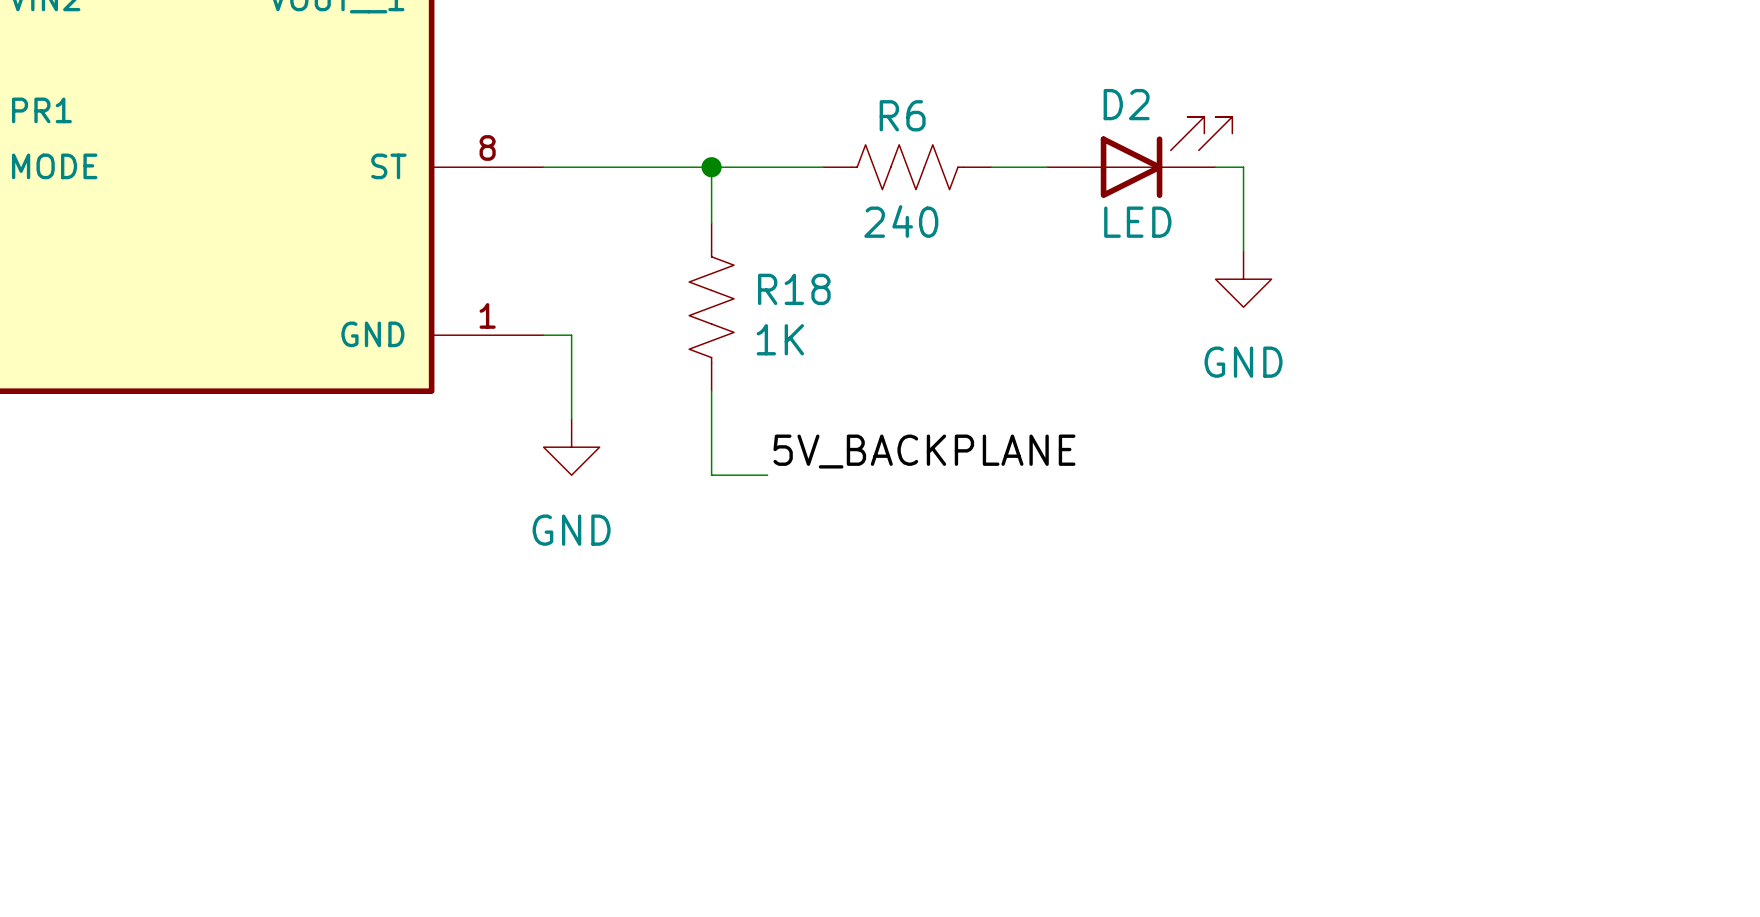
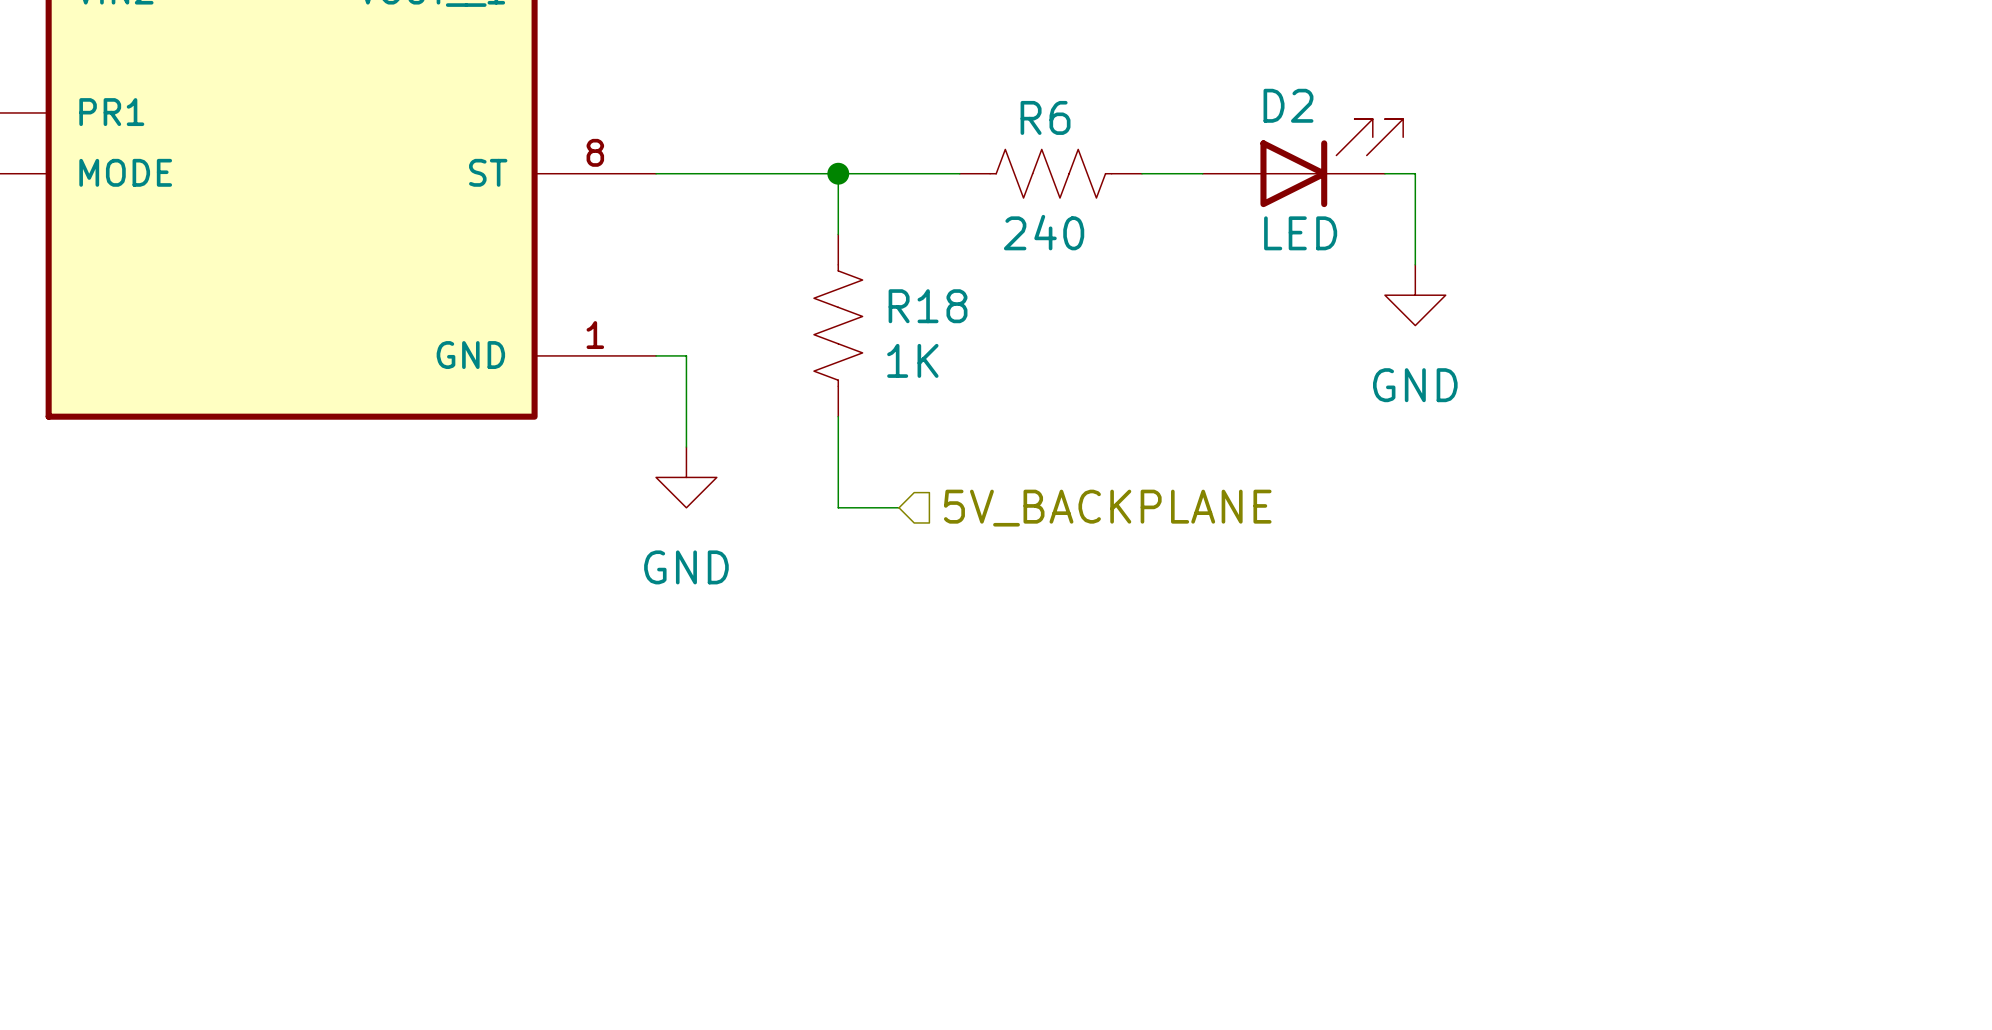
label: 5V_BACKPLANE (924, 451) -> none
hierarchical label: none -> 5V_BACKPLANE (1107, 508)

